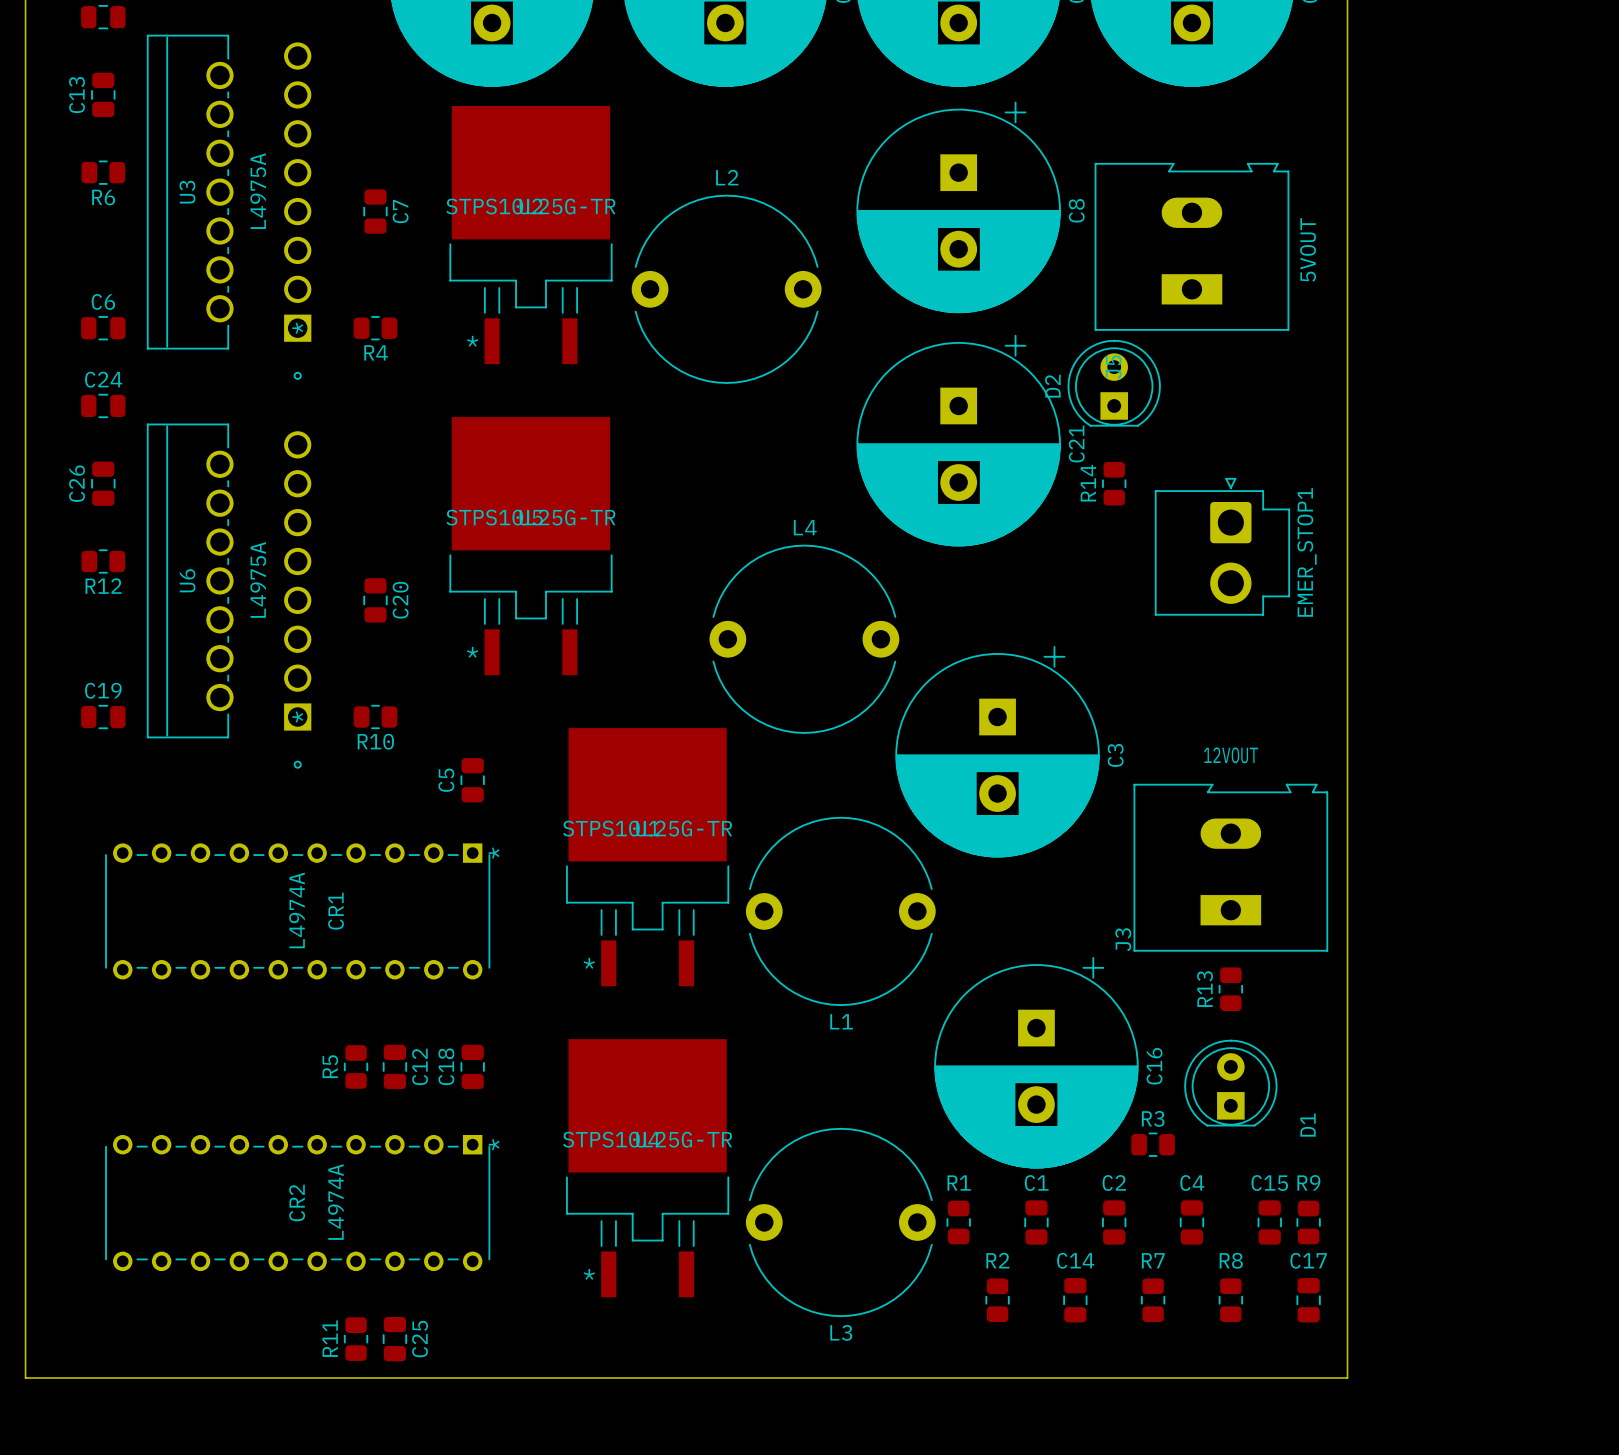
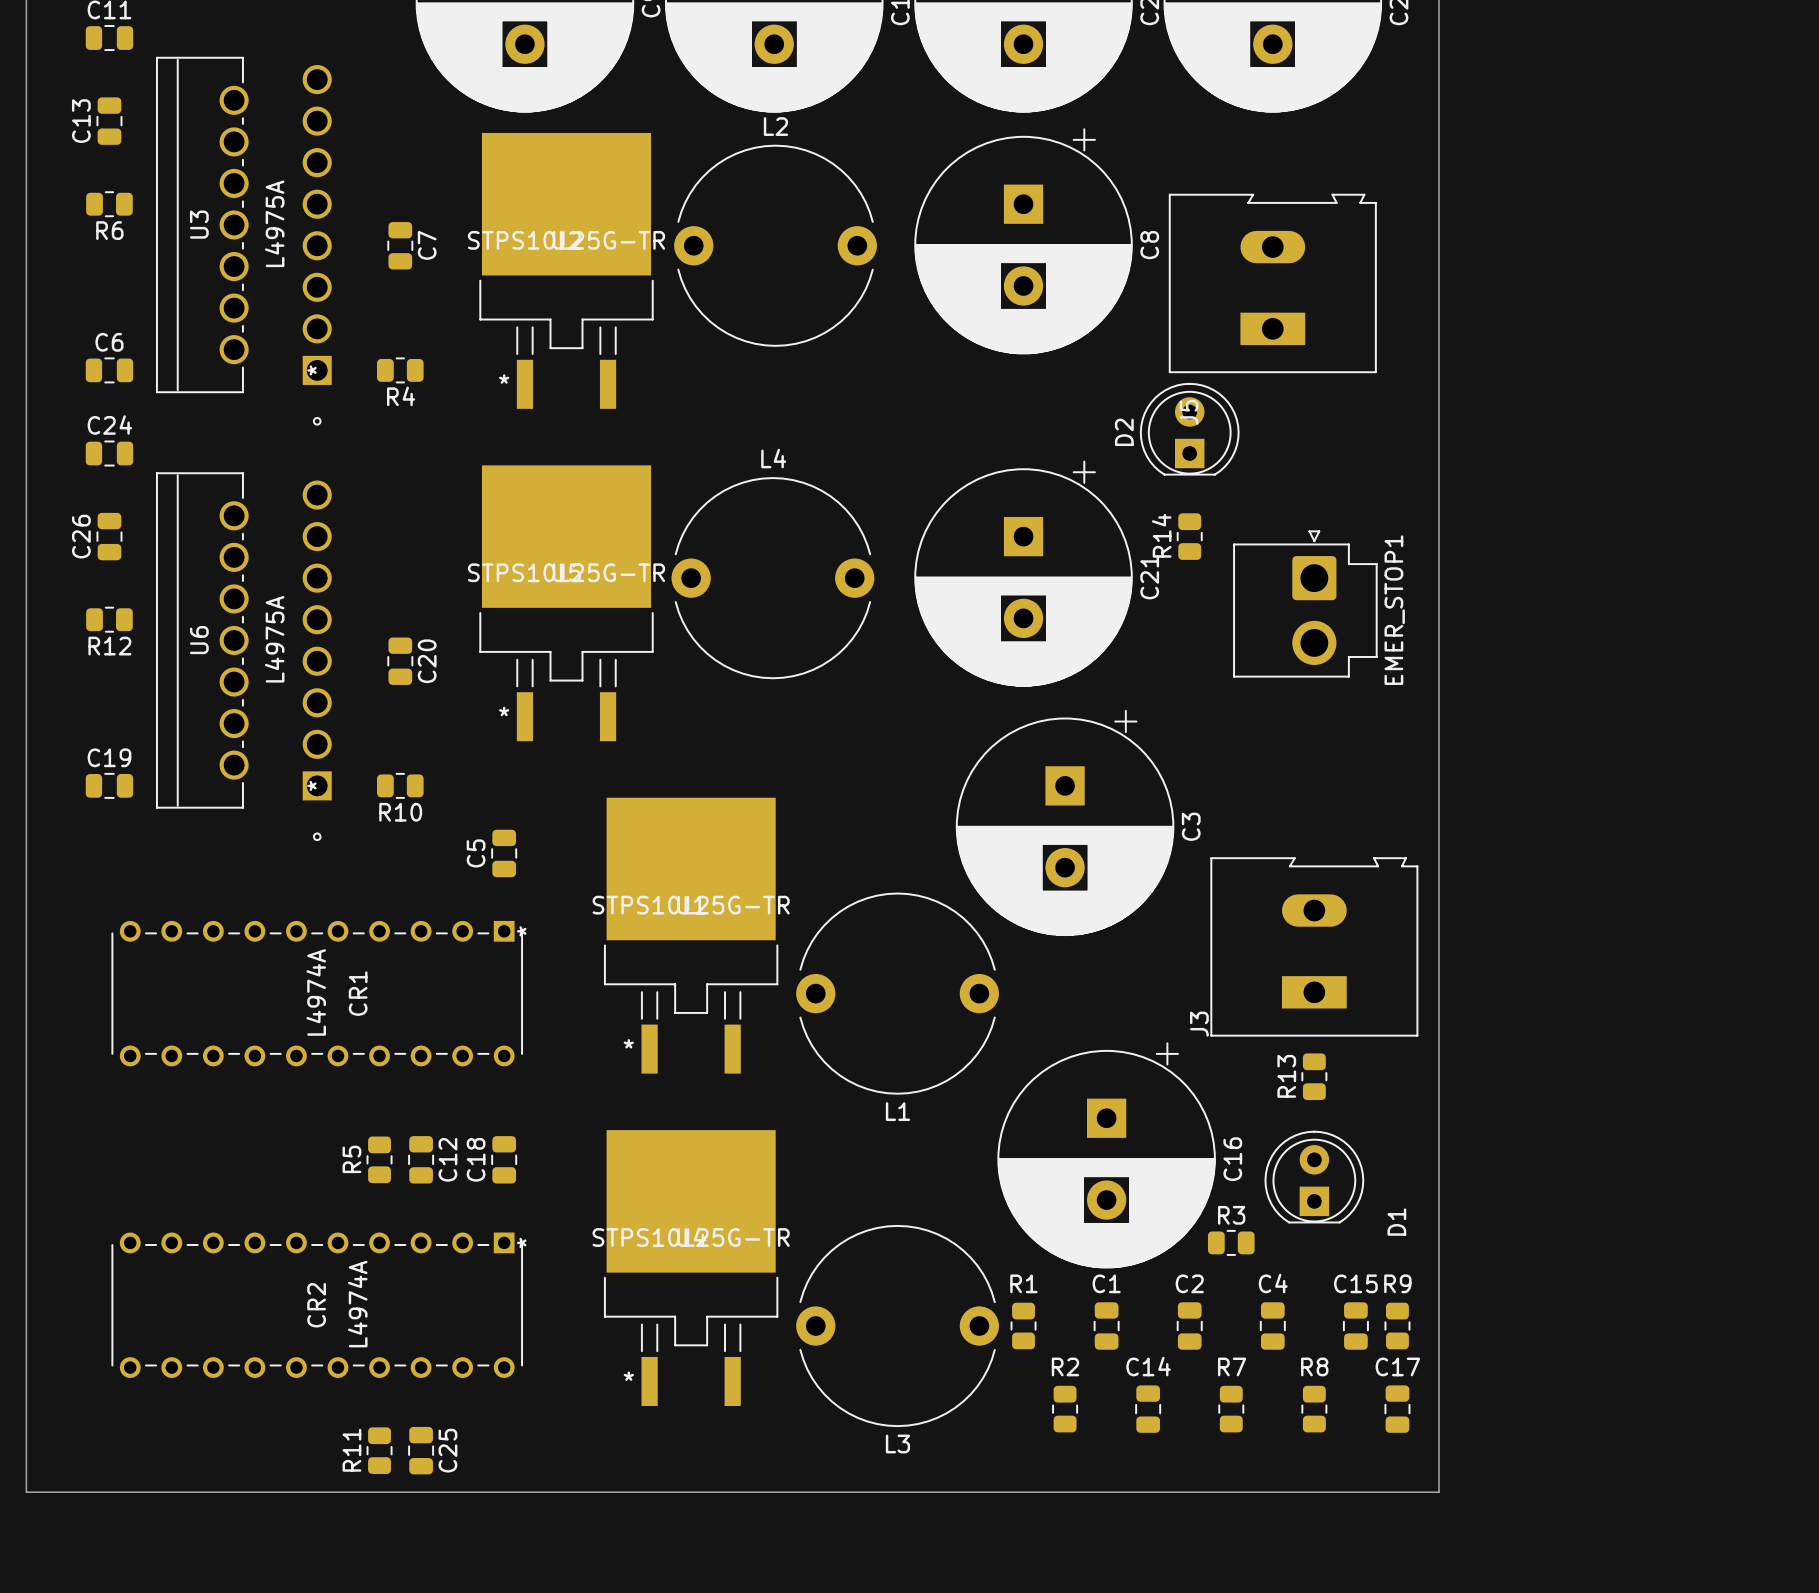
text: 5VOUT (1308, 249) -> none
L2 position: (726, 289) -> (775, 245)
C21 position: (958, 440) -> (1023, 573)
L4 position: (804, 639) -> (772, 578)
text: 12VOUT (1231, 755) -> none

